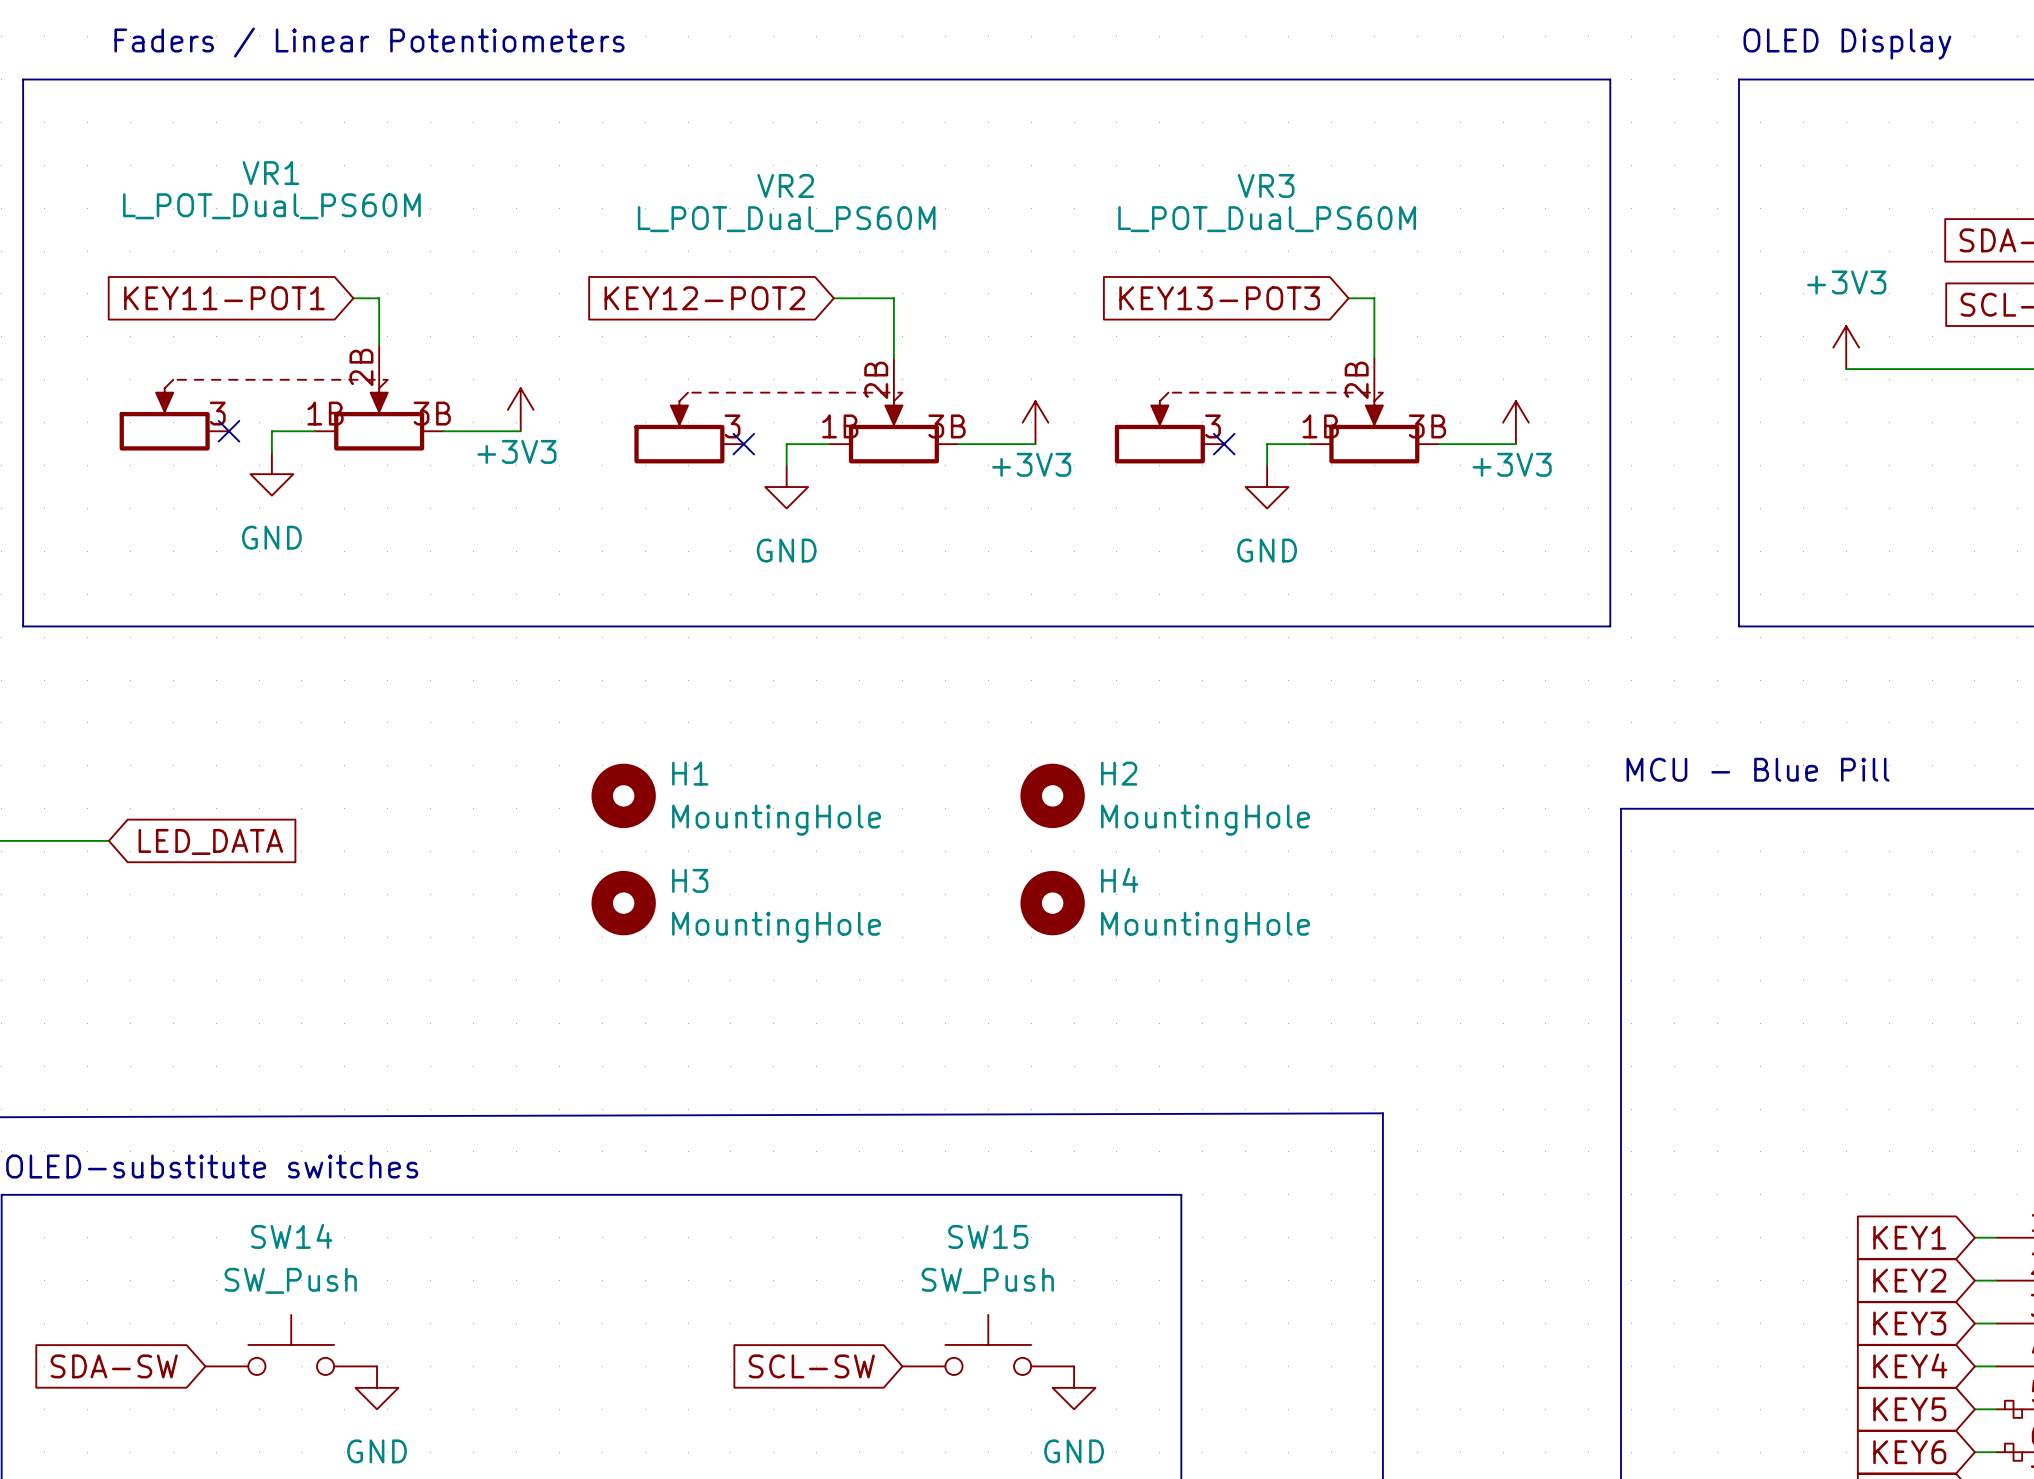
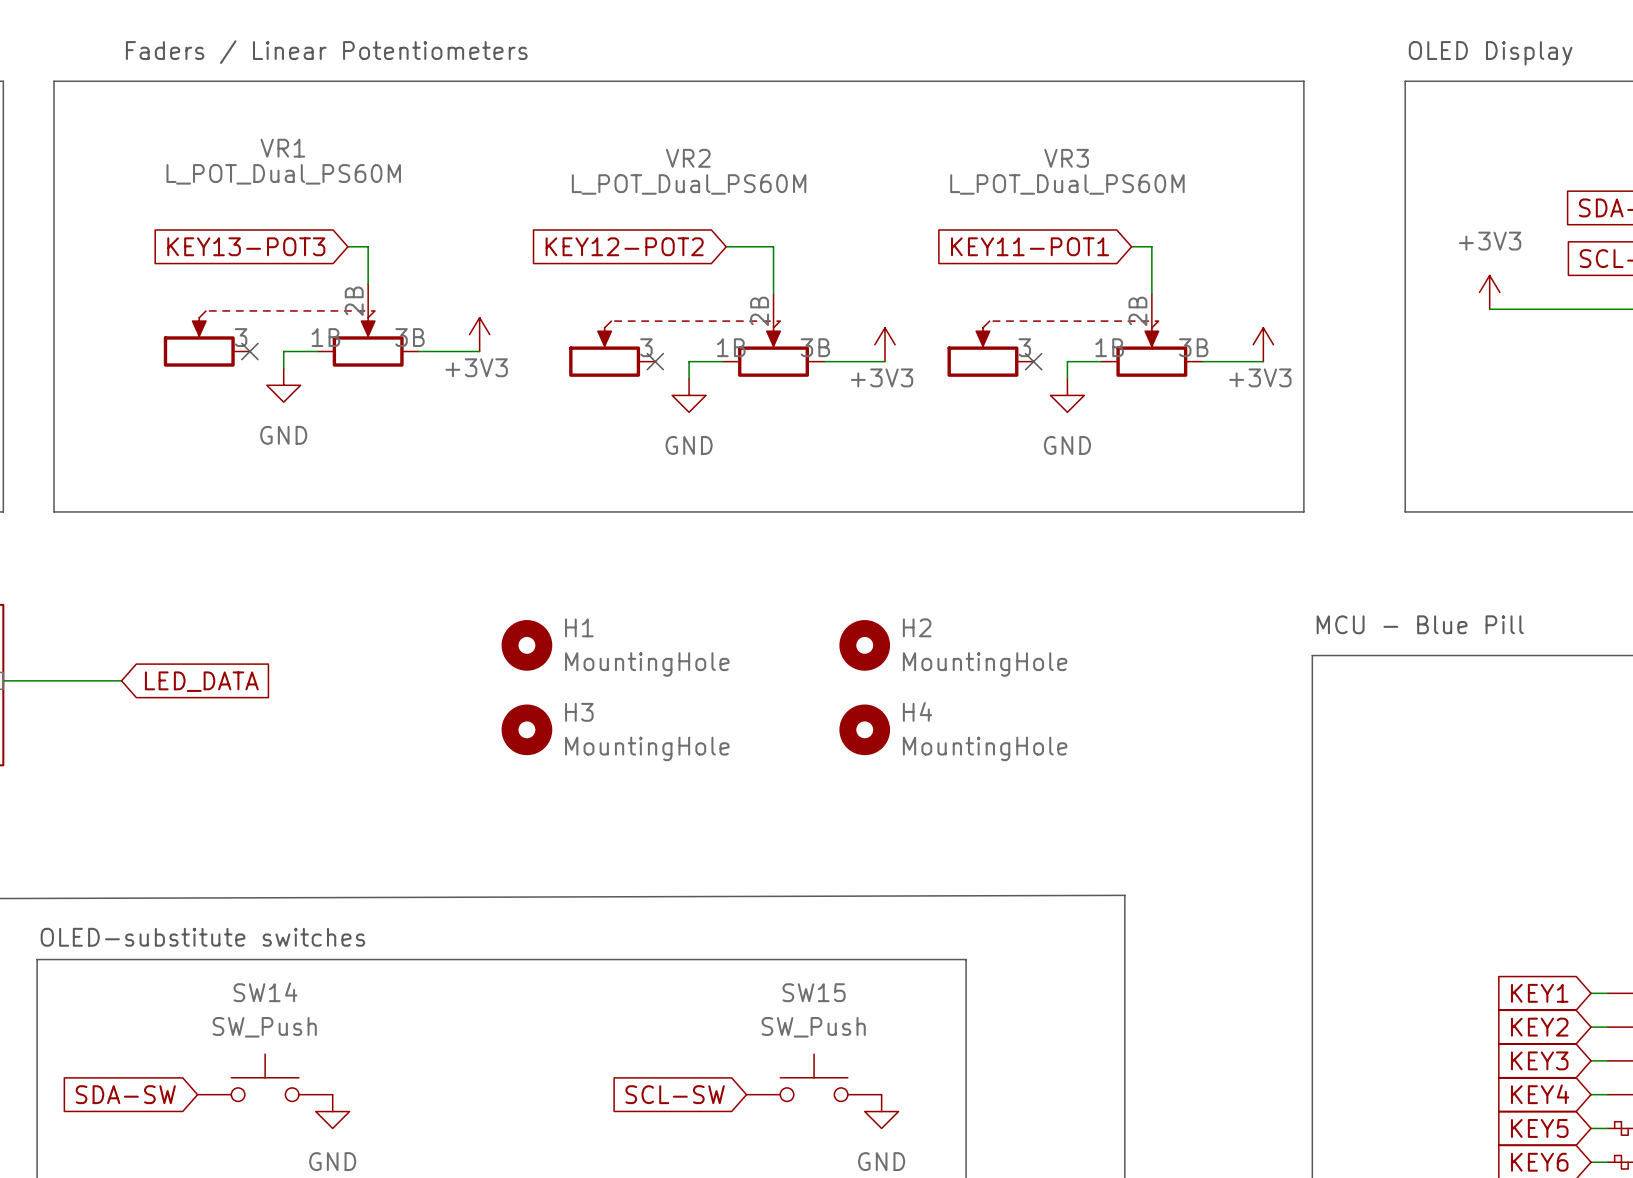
global label: KEY11-POT1 (224, 298) -> KEY13-POT3 (246, 246)
wire: (353, 298) (379, 298) (379, 345) -> (347, 246) (368, 246) (368, 283)
global label position: KEY12-POT2 (704, 298) -> KEY12-POT2 (624, 246)
wire: (833, 298) (893, 298) (893, 358) -> (726, 246) (773, 246) (773, 294)
global label: KEY13-POT3 (1219, 298) -> KEY11-POT1 (1030, 246)
wire: (1348, 298) (1374, 298) (1374, 358) -> (1131, 246) (1151, 246) (1151, 294)
VR1 position: (281, 398) -> (291, 325)
power symbol position: +3V3 (520, 409) -> +3V3 (479, 334)
VR2 position: (796, 410) -> (696, 335)
VR3 position: (1276, 410) -> (1075, 335)
power symbol position: +3V3 (1035, 422) -> +3V3 (885, 344)
power symbol position: +3V3 (1515, 422) -> +3V3 (1263, 344)
no-connect mark position: (229, 431) -> (249, 351)
wire: (314, 431) (271, 431) (271, 452) -> (317, 351) (283, 351) (283, 368)
wire: (443, 431) (520, 431) -> (418, 351) (479, 351)
no-connect mark position: (743, 444) -> (655, 361)
wire: (829, 444) (786, 444) (786, 465) -> (722, 361) (689, 361) (689, 378)
wire: (958, 444) (1035, 444) -> (824, 361) (885, 361)
no-connect mark position: (1224, 444) -> (1033, 361)
wire: (1310, 444) (1267, 444) (1267, 465) -> (1101, 361) (1067, 361) (1067, 378)
wire: (1438, 444) (1515, 444) -> (1202, 361) (1263, 361)
power symbol position: GND (271, 474) -> GND (283, 385)
power symbol position: GND (786, 487) -> GND (689, 395)
power symbol position: GND (1267, 487) -> GND (1067, 395)

